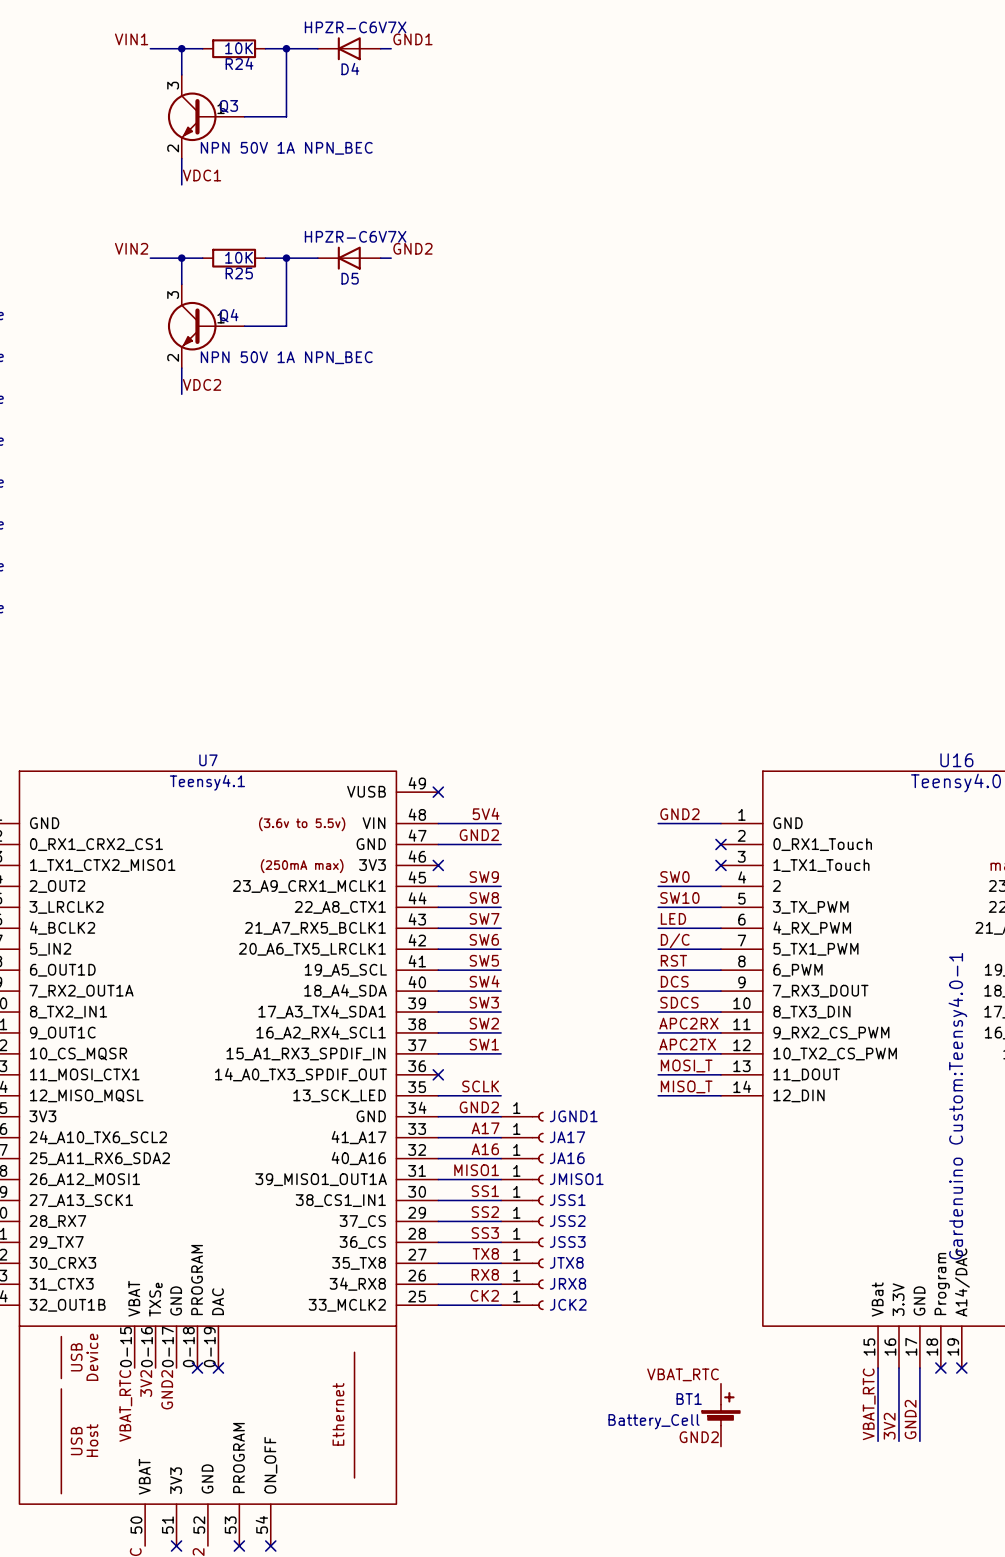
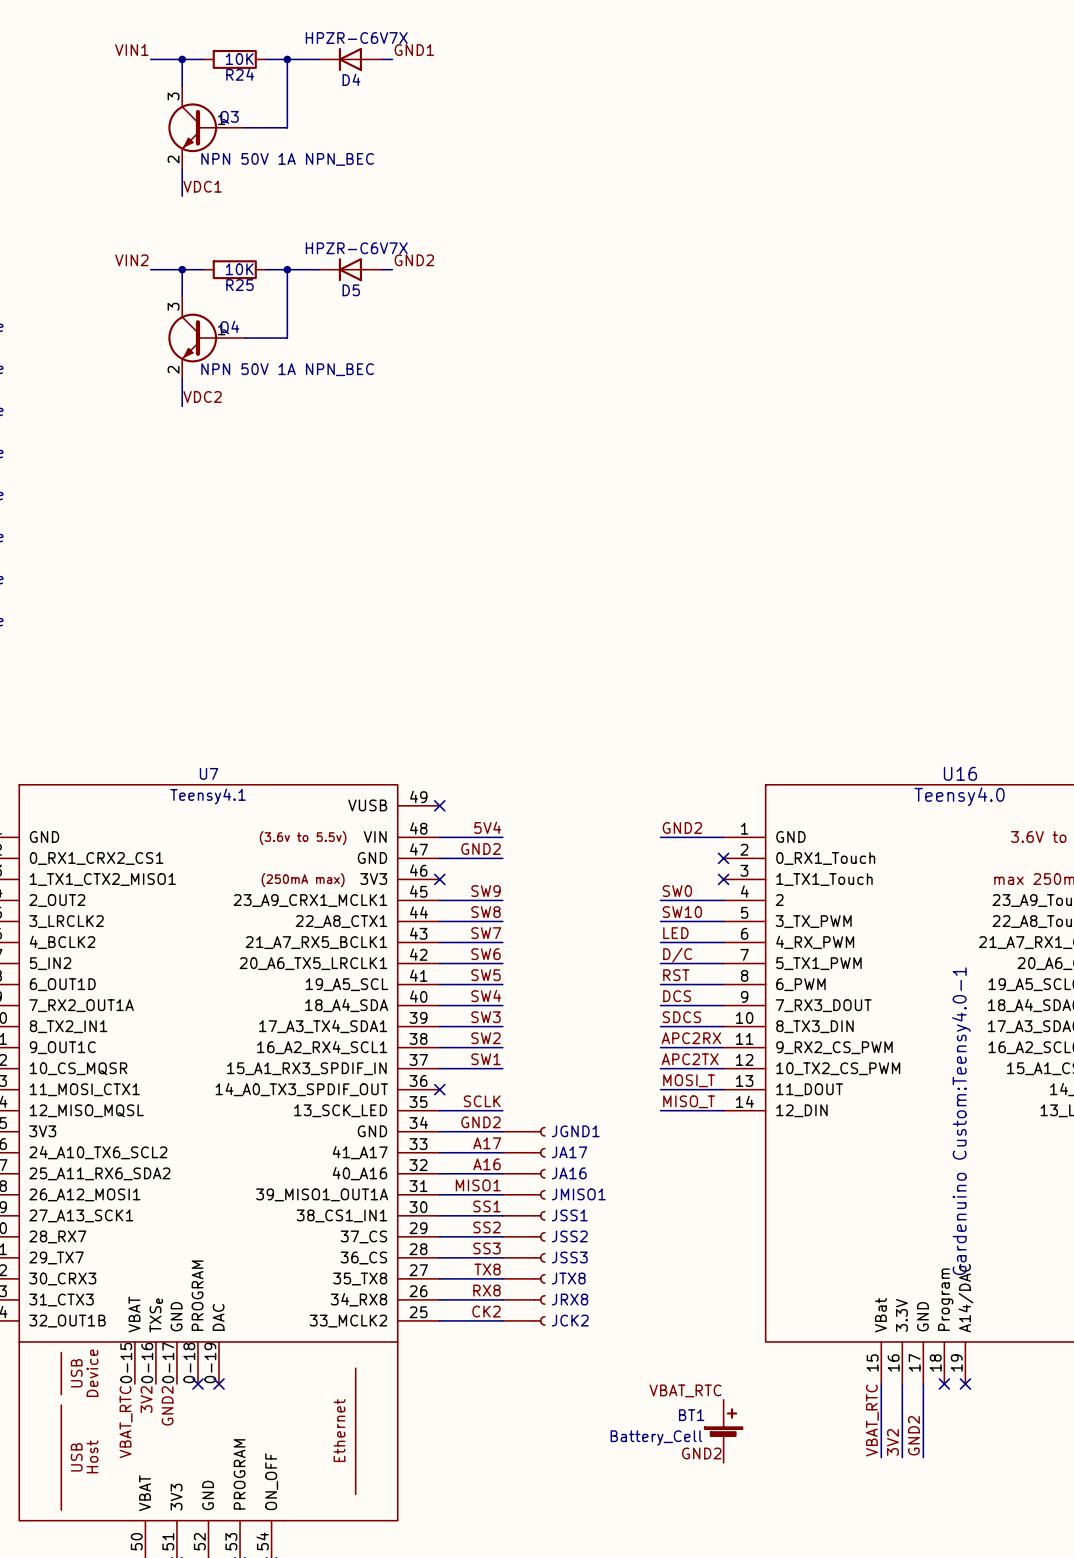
JGND1 pin number: 1 (516, 1108) -> none
JA17 pin number: 1 (516, 1129) -> none
JA16 pin number: 1 (516, 1149) -> none
JMISO1 pin number: 1 (516, 1170) -> none
JSS1 pin number: 1 (516, 1191) -> none
JSS2 pin number: 1 (516, 1212) -> none
JSS3 pin number: 1 (516, 1233) -> none
JTX8 pin number: 1 (516, 1254) -> none
JRX8 pin number: 1 (516, 1275) -> none
JCK2 pin number: 1 (516, 1296) -> none

